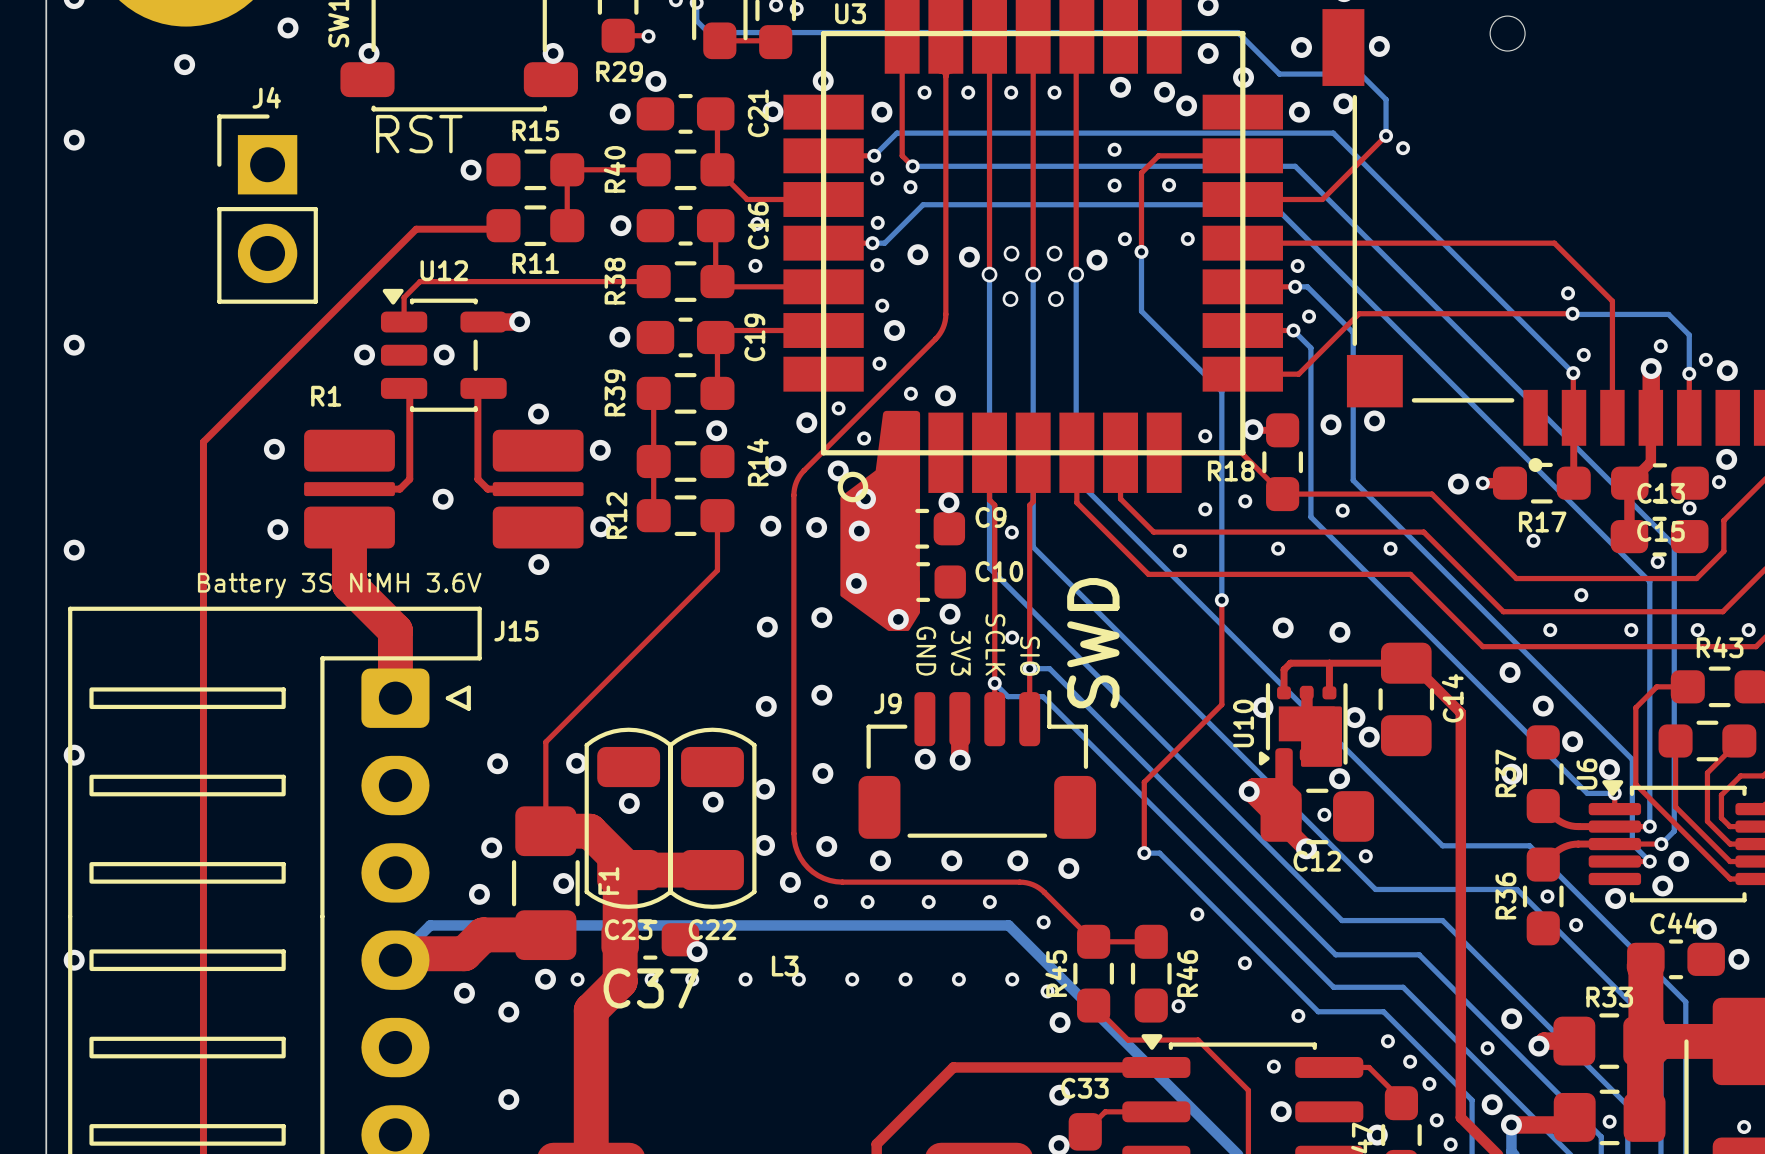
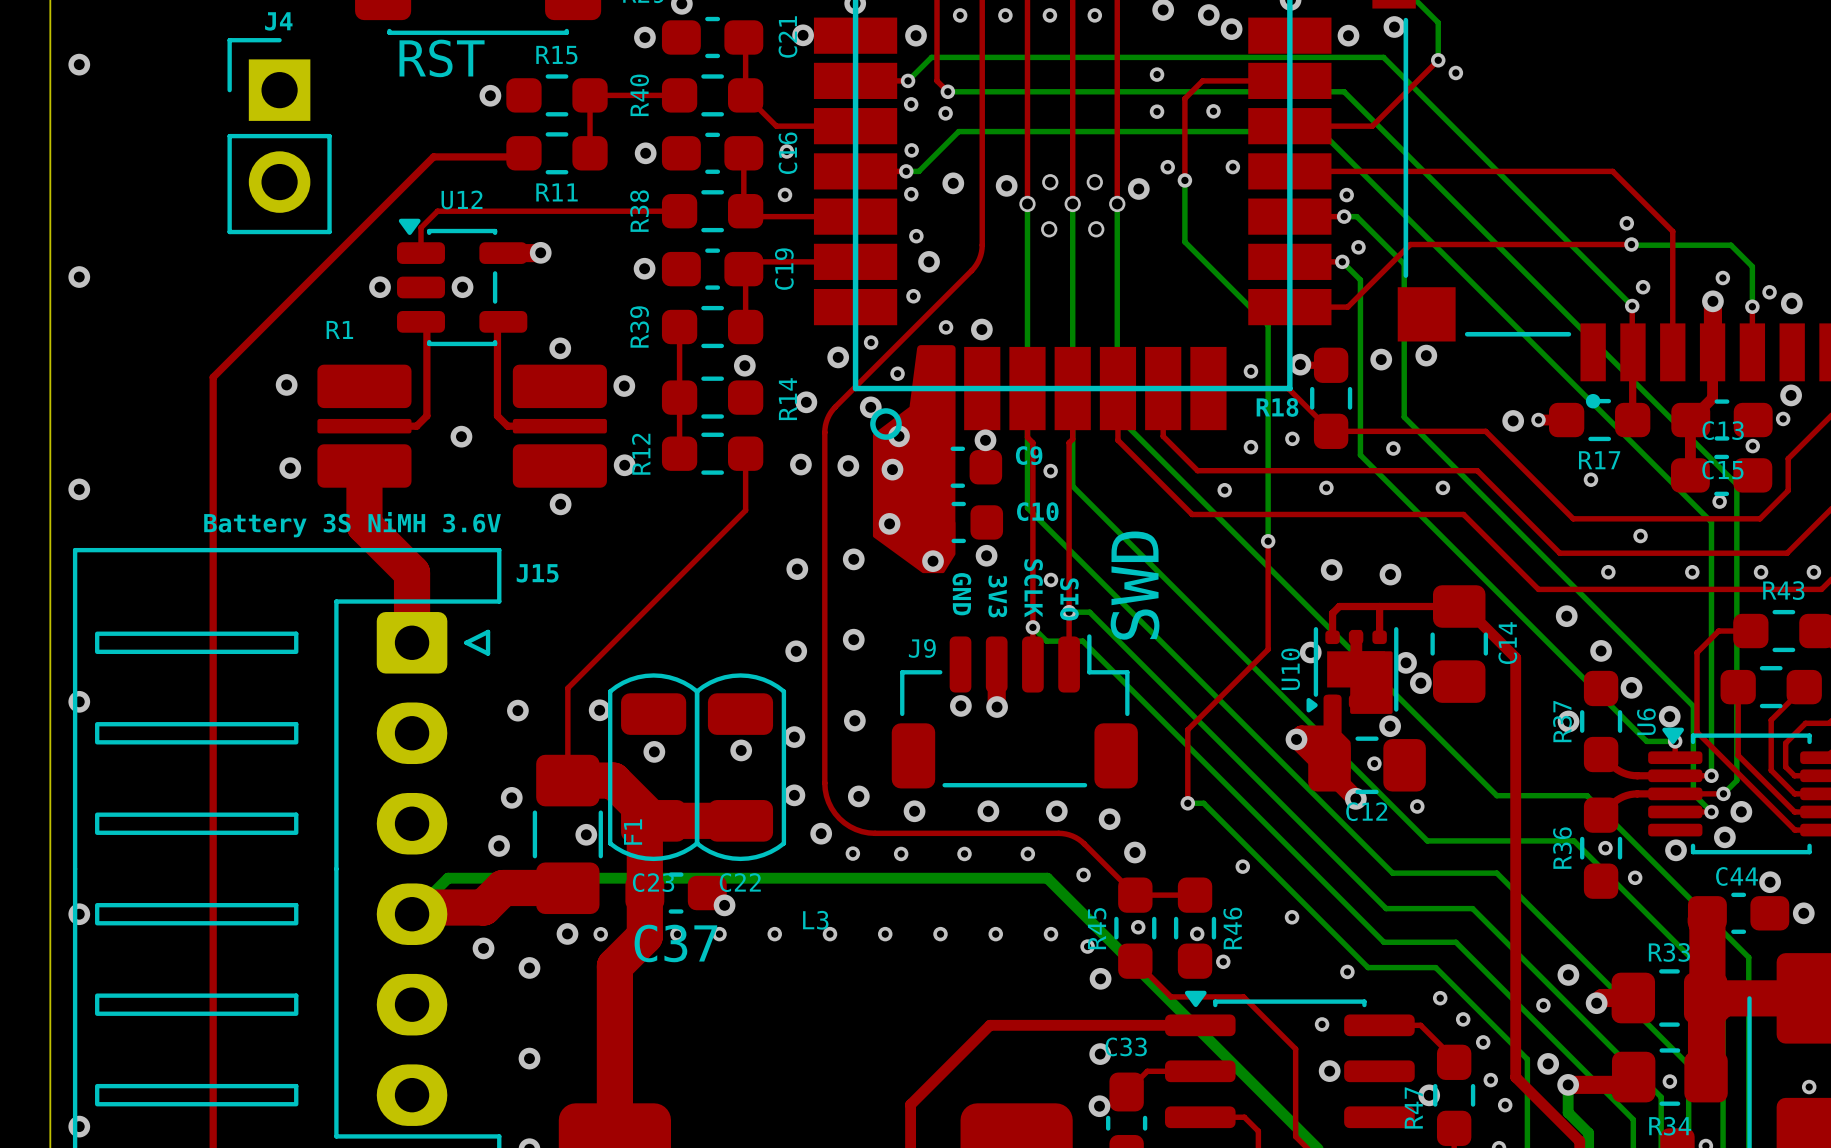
via: none -> (1134, 852)
via: none -> (1138, 927)
via: none -> (1197, 933)

